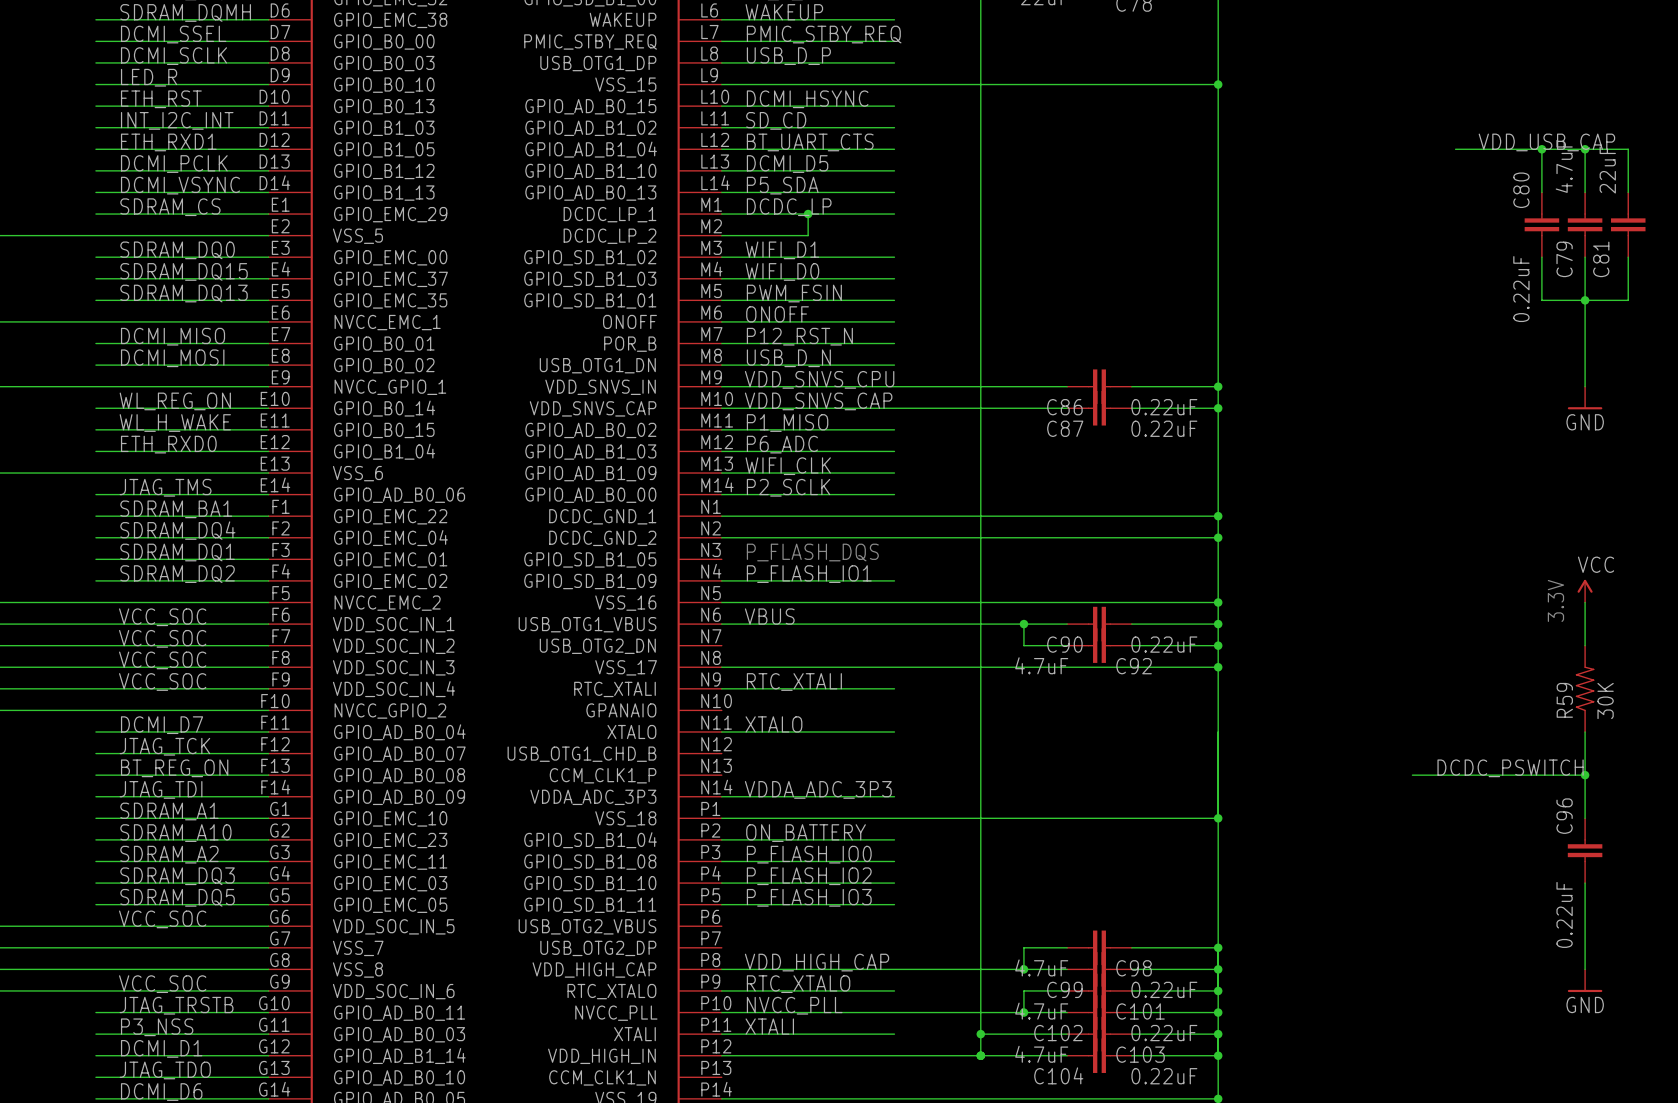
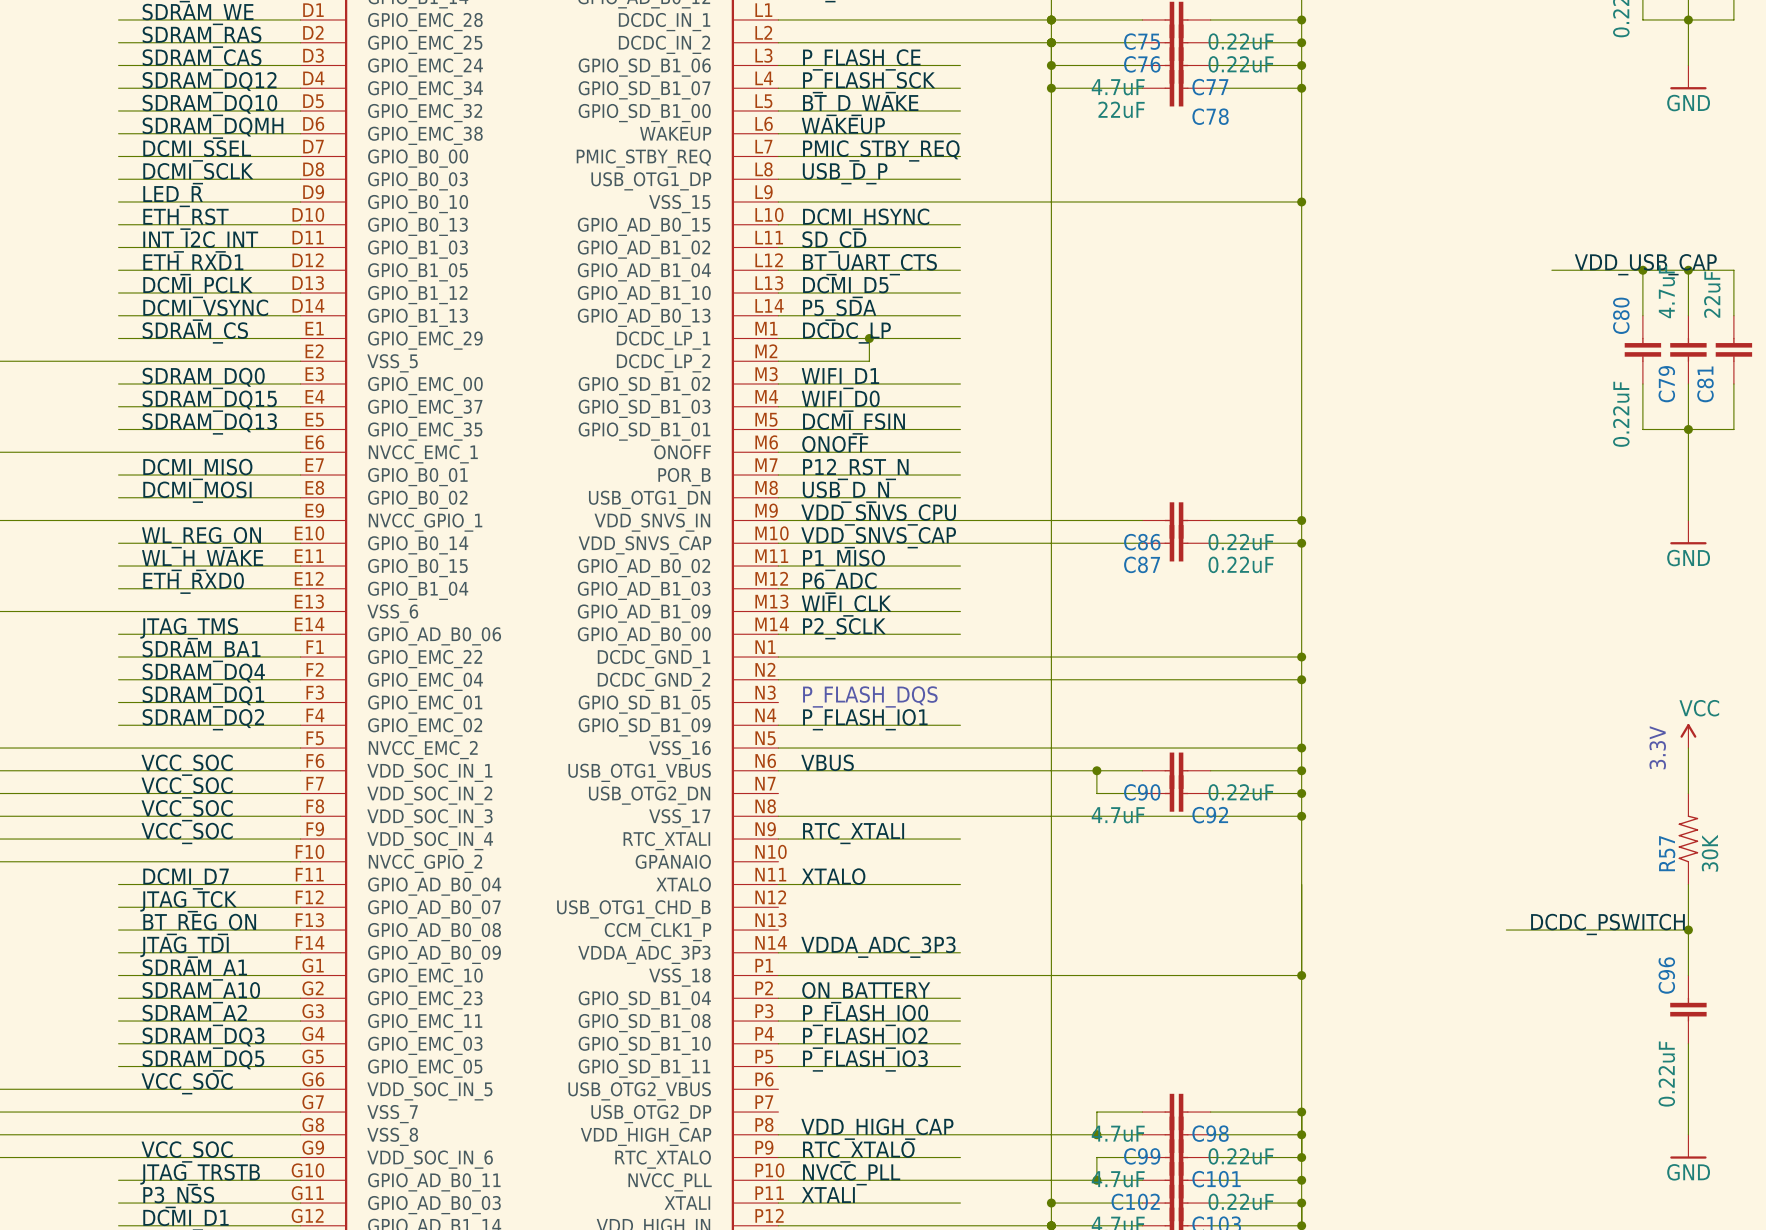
label: PWM_FSIN (794, 293) -> DCMI_FSIN (854, 423)
R59 name: R59 (1564, 700) -> R57 (1667, 853)

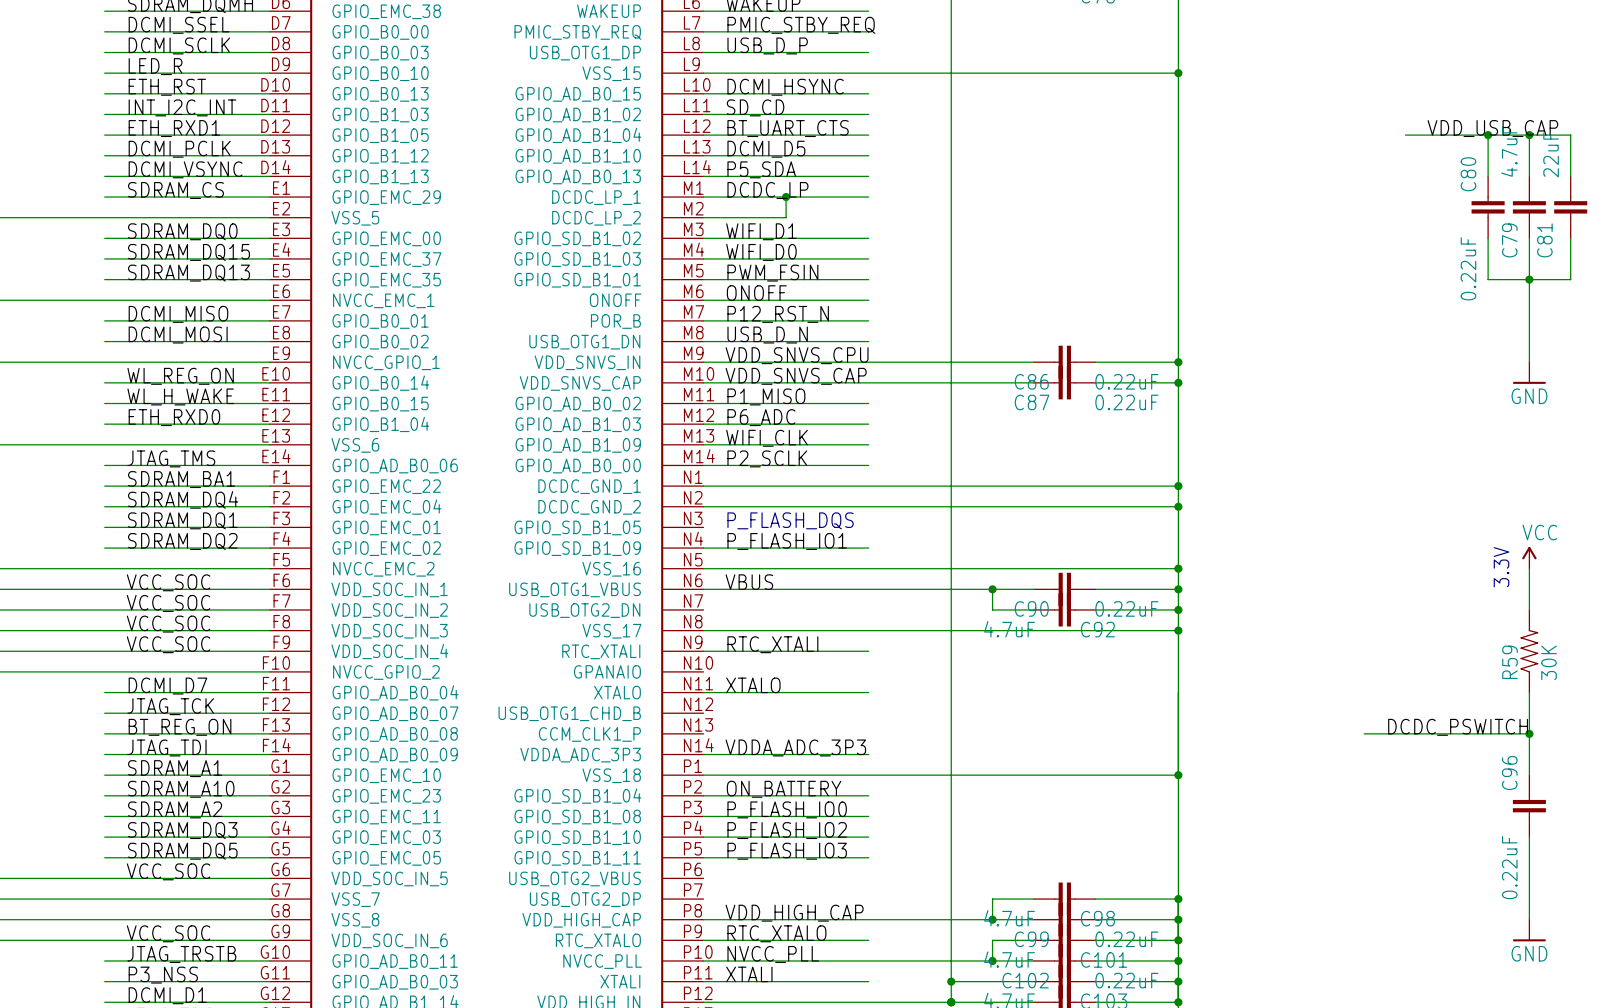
label: DCMI_FSIN (854, 423) -> PWM_FSIN (772, 273)
R57 name: R57 (1667, 853) -> R59 (1509, 662)

